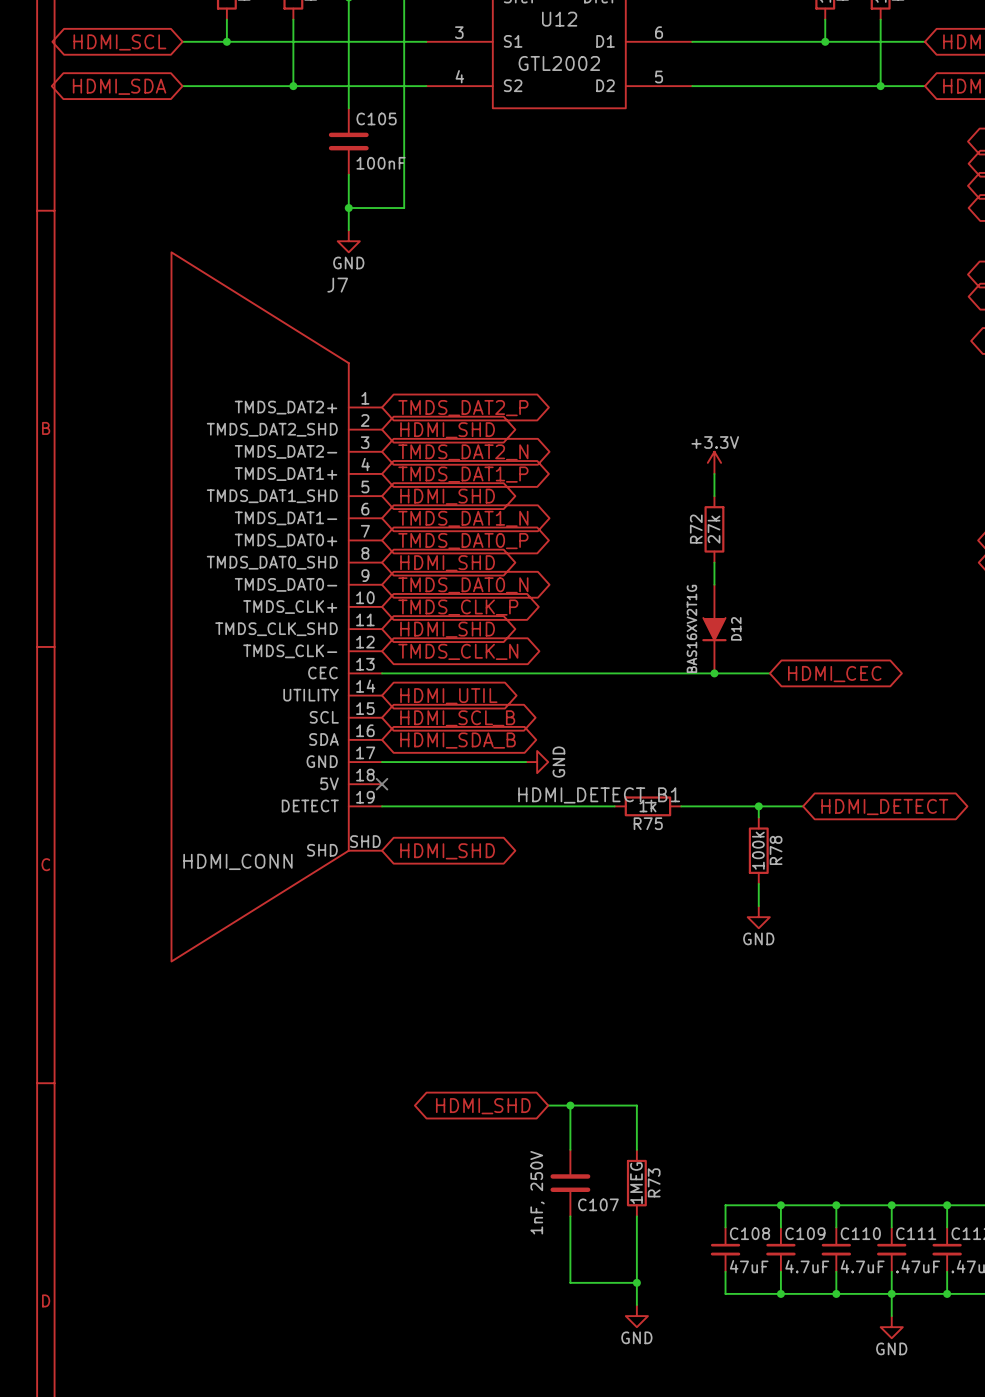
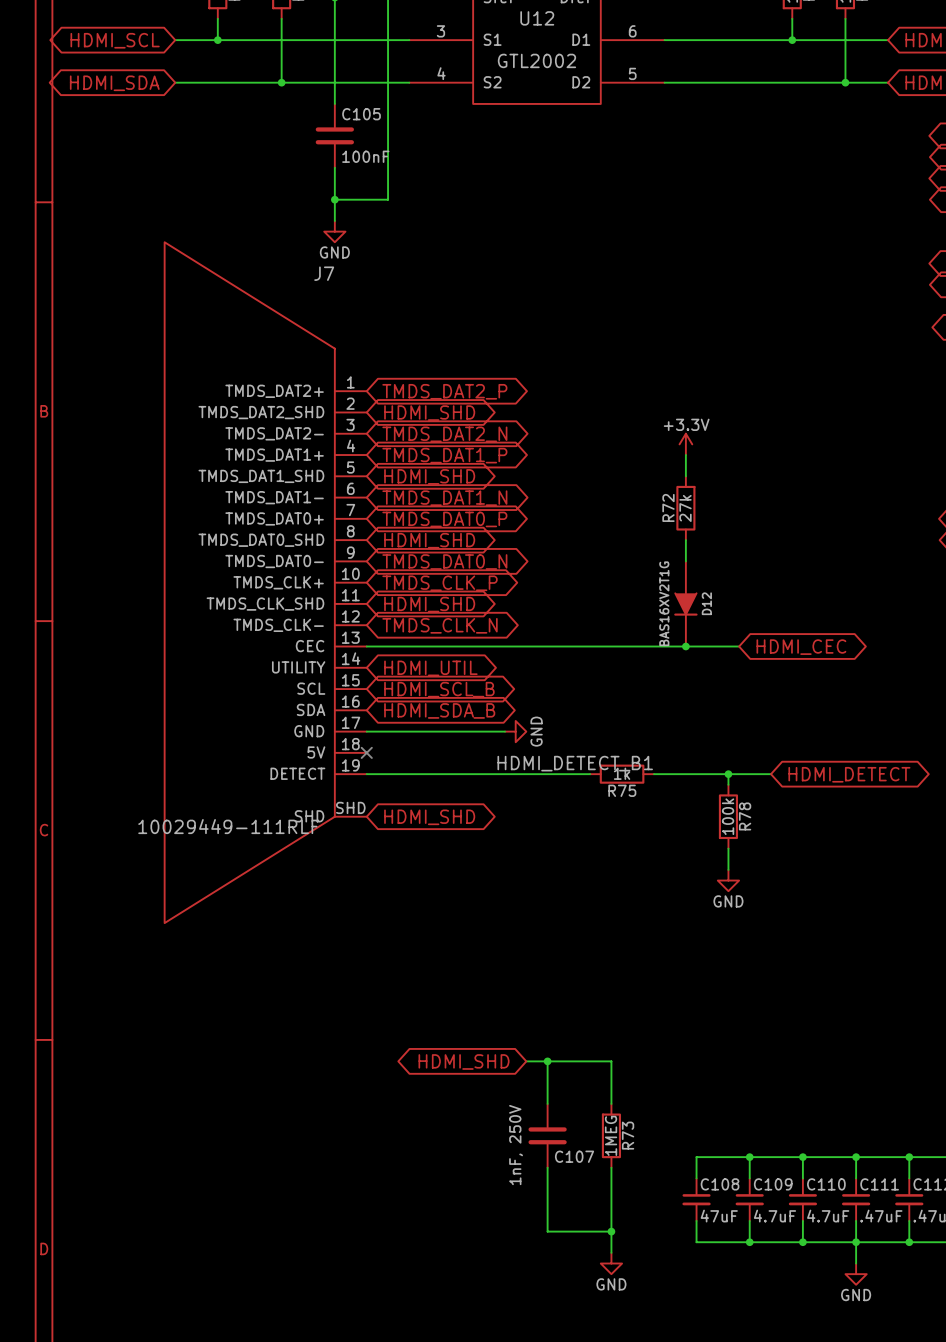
J7 value: HDMI_CONN (237, 861) -> 10029449-111RLF (228, 826)

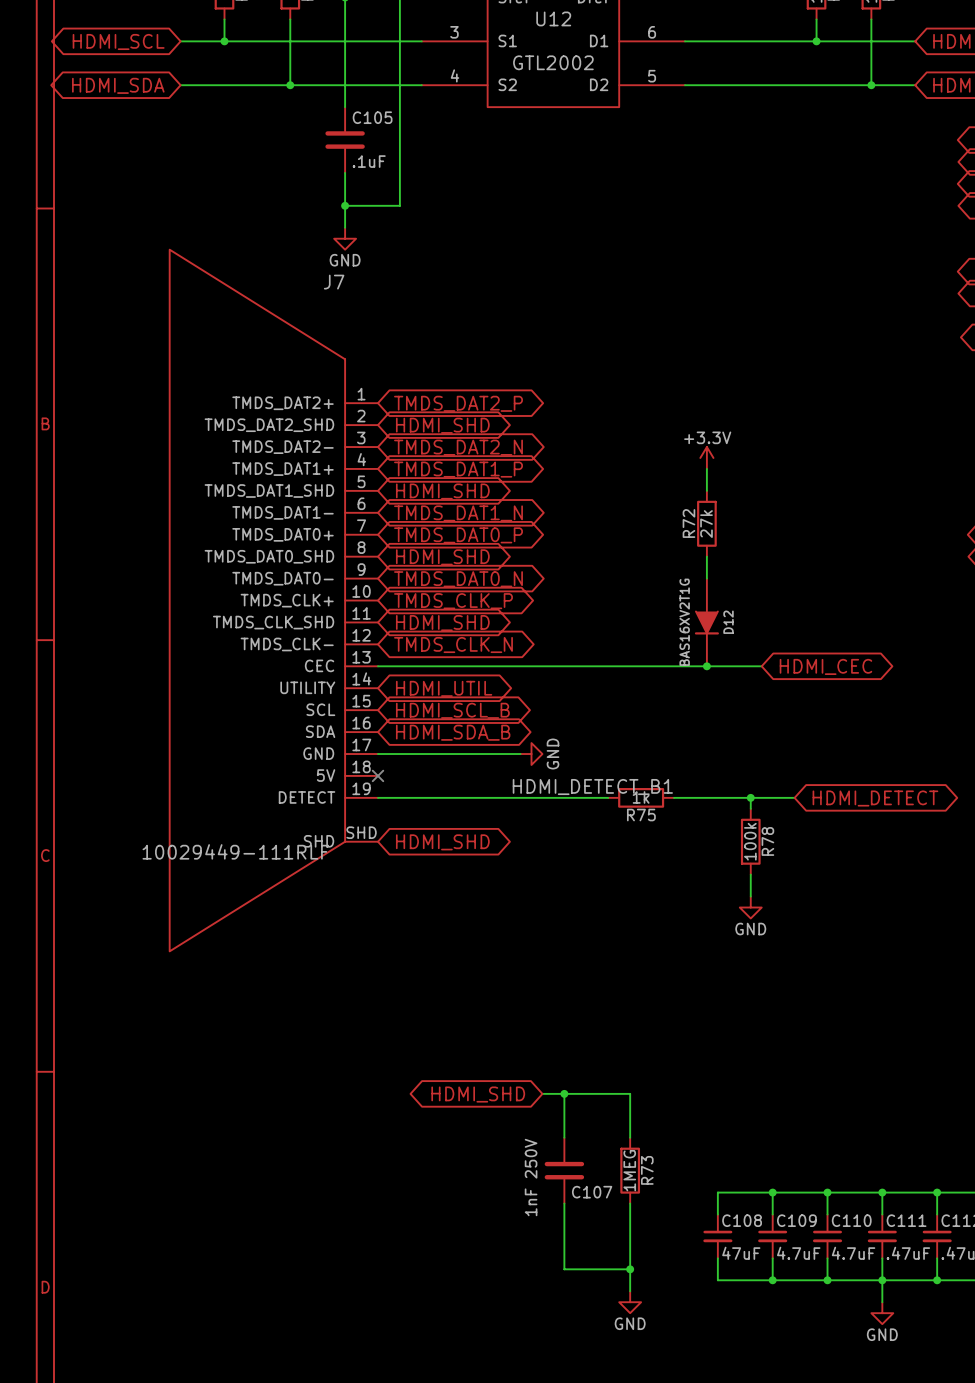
C105 value: 100nF (365, 156) -> .1uF (369, 161)
C107 value: 1nF, 250V (516, 1145) -> 1nF 250V (531, 1177)

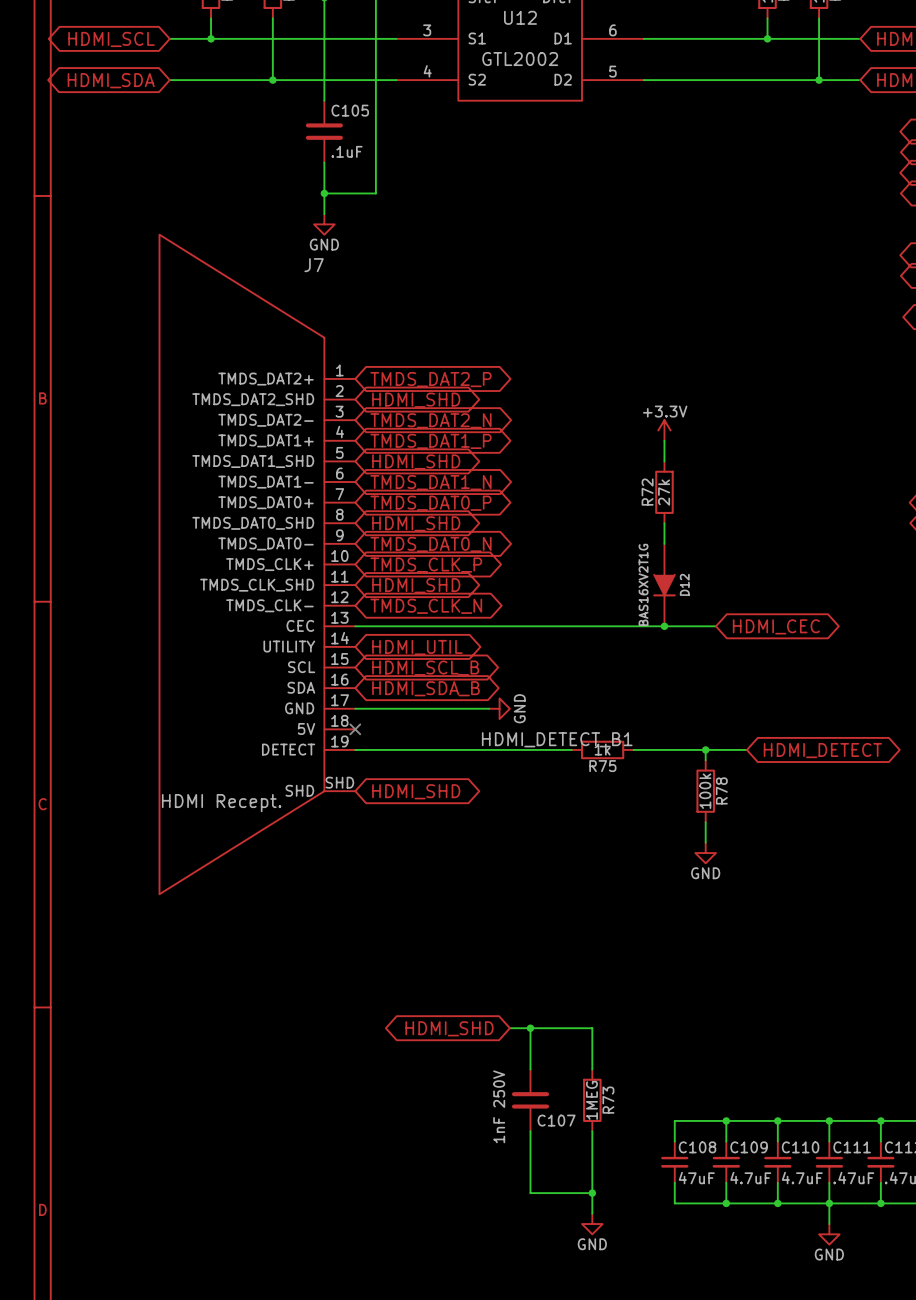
J7 value: 10029449-111RLF (235, 851) -> HDMI Recept. (221, 803)

